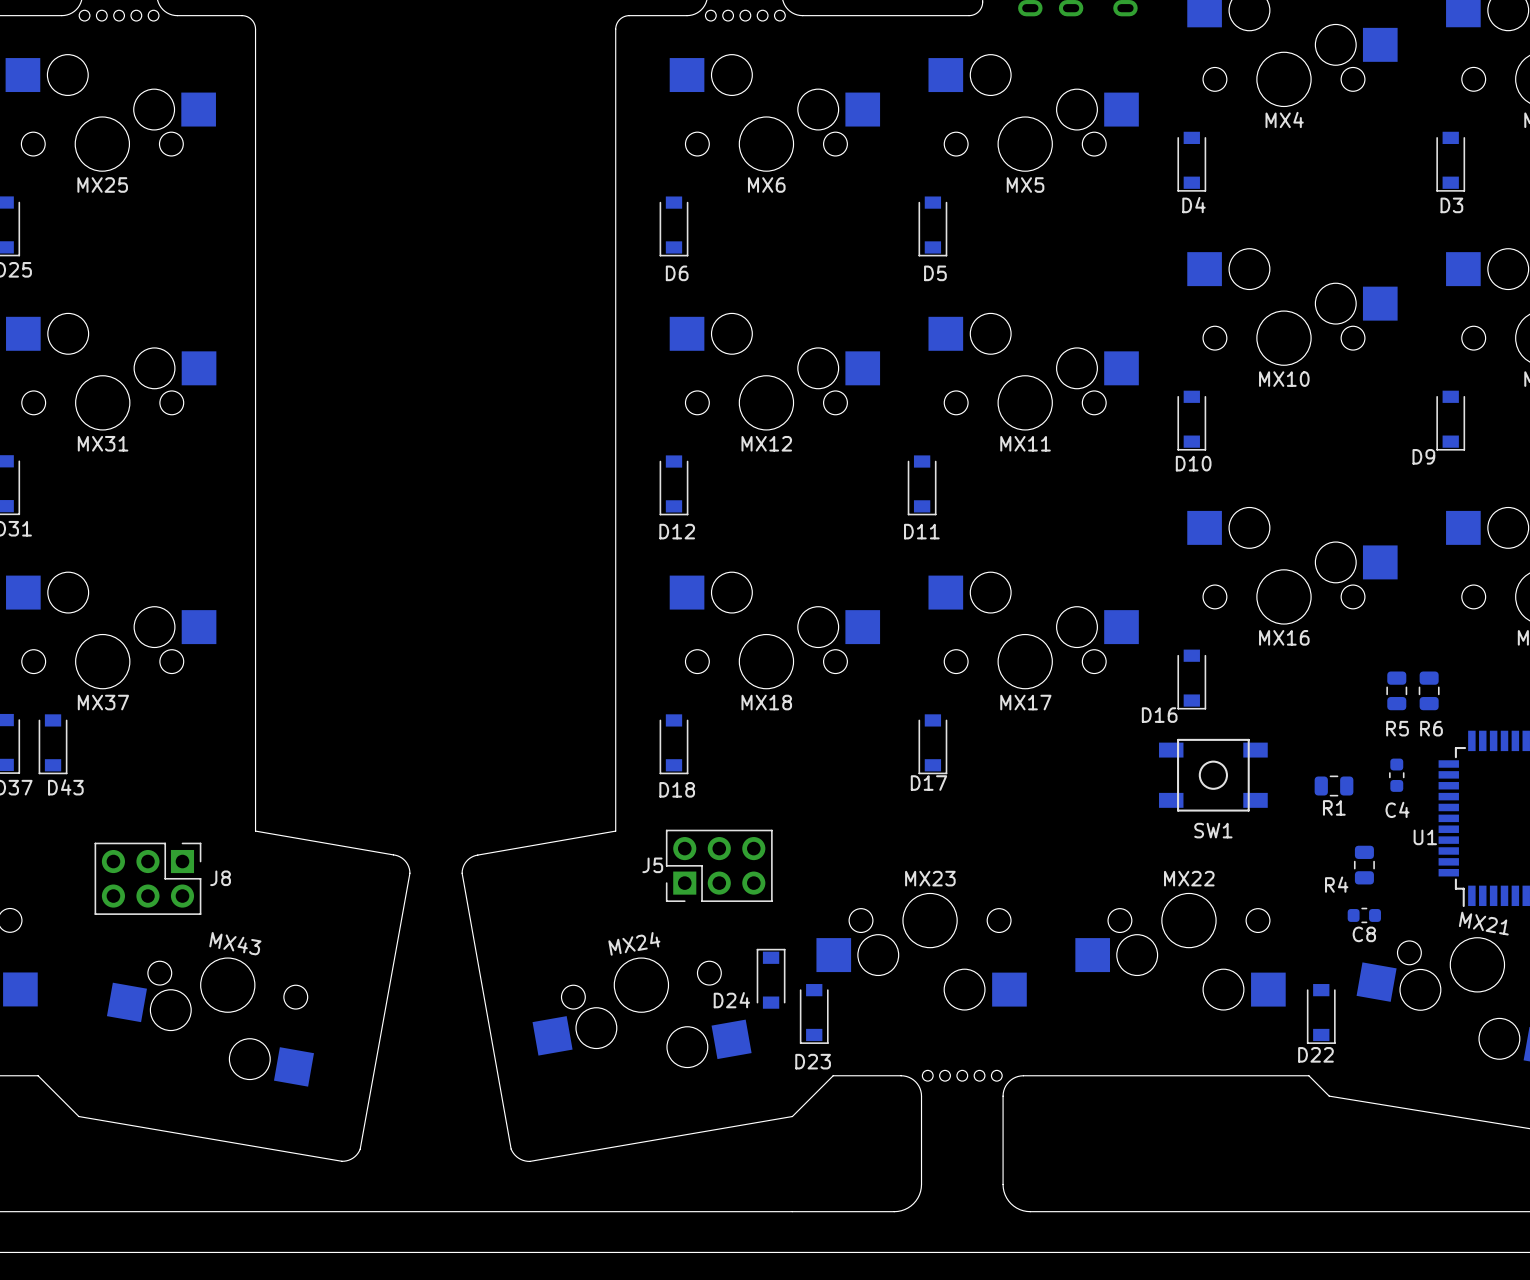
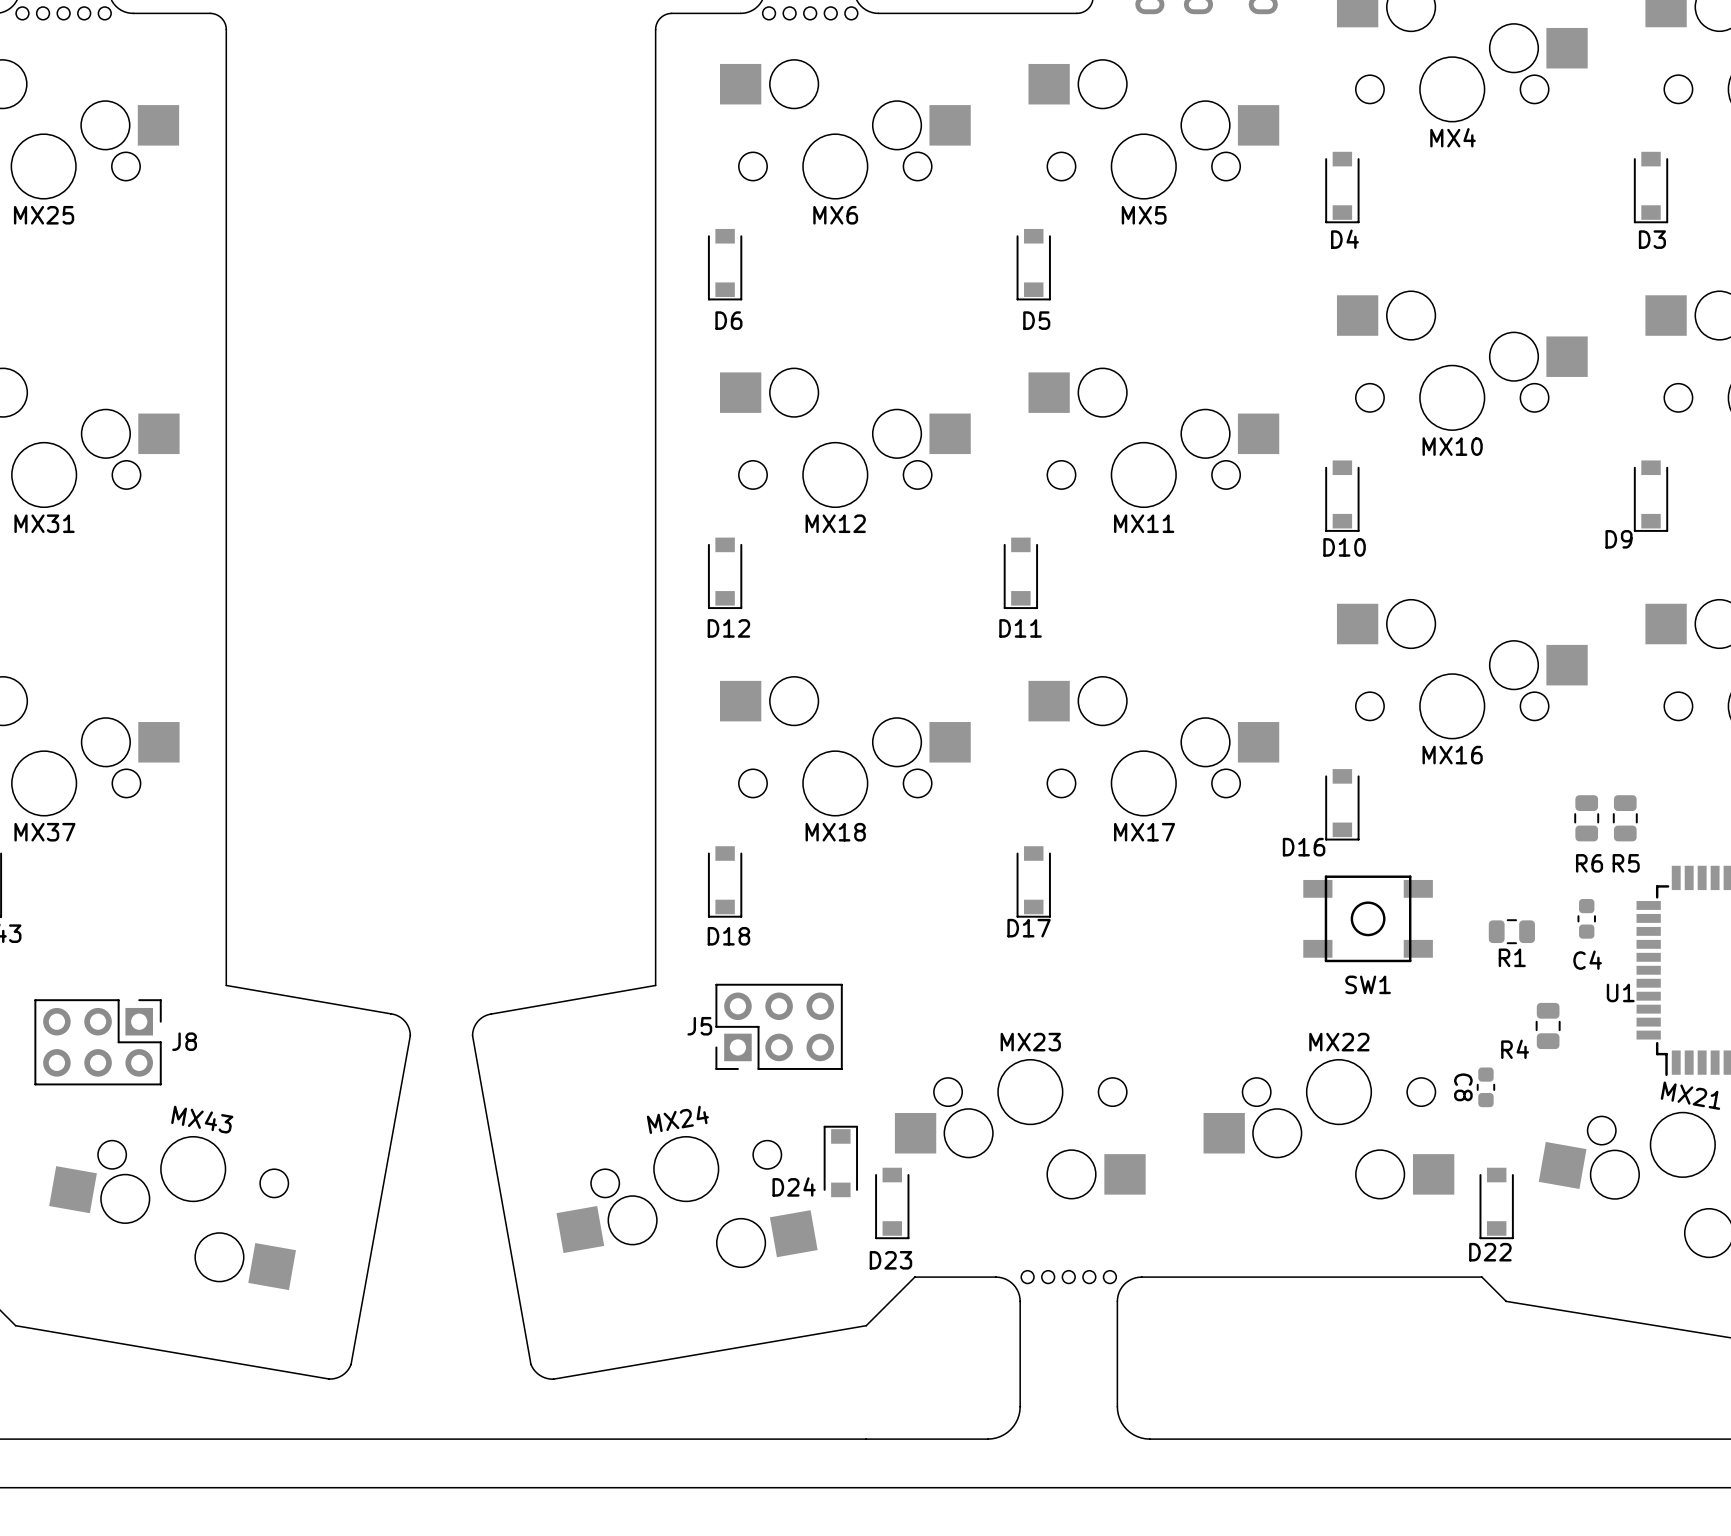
R5 name: R5 (1397, 728) -> R6 (1589, 863)
R6 name: R6 (1431, 728) -> R5 (1626, 863)
C8 rotation: 0° (1364, 915) -> 90° clockwise (1485, 1087)
C8 position: (1364, 915) -> (1485, 1087)

